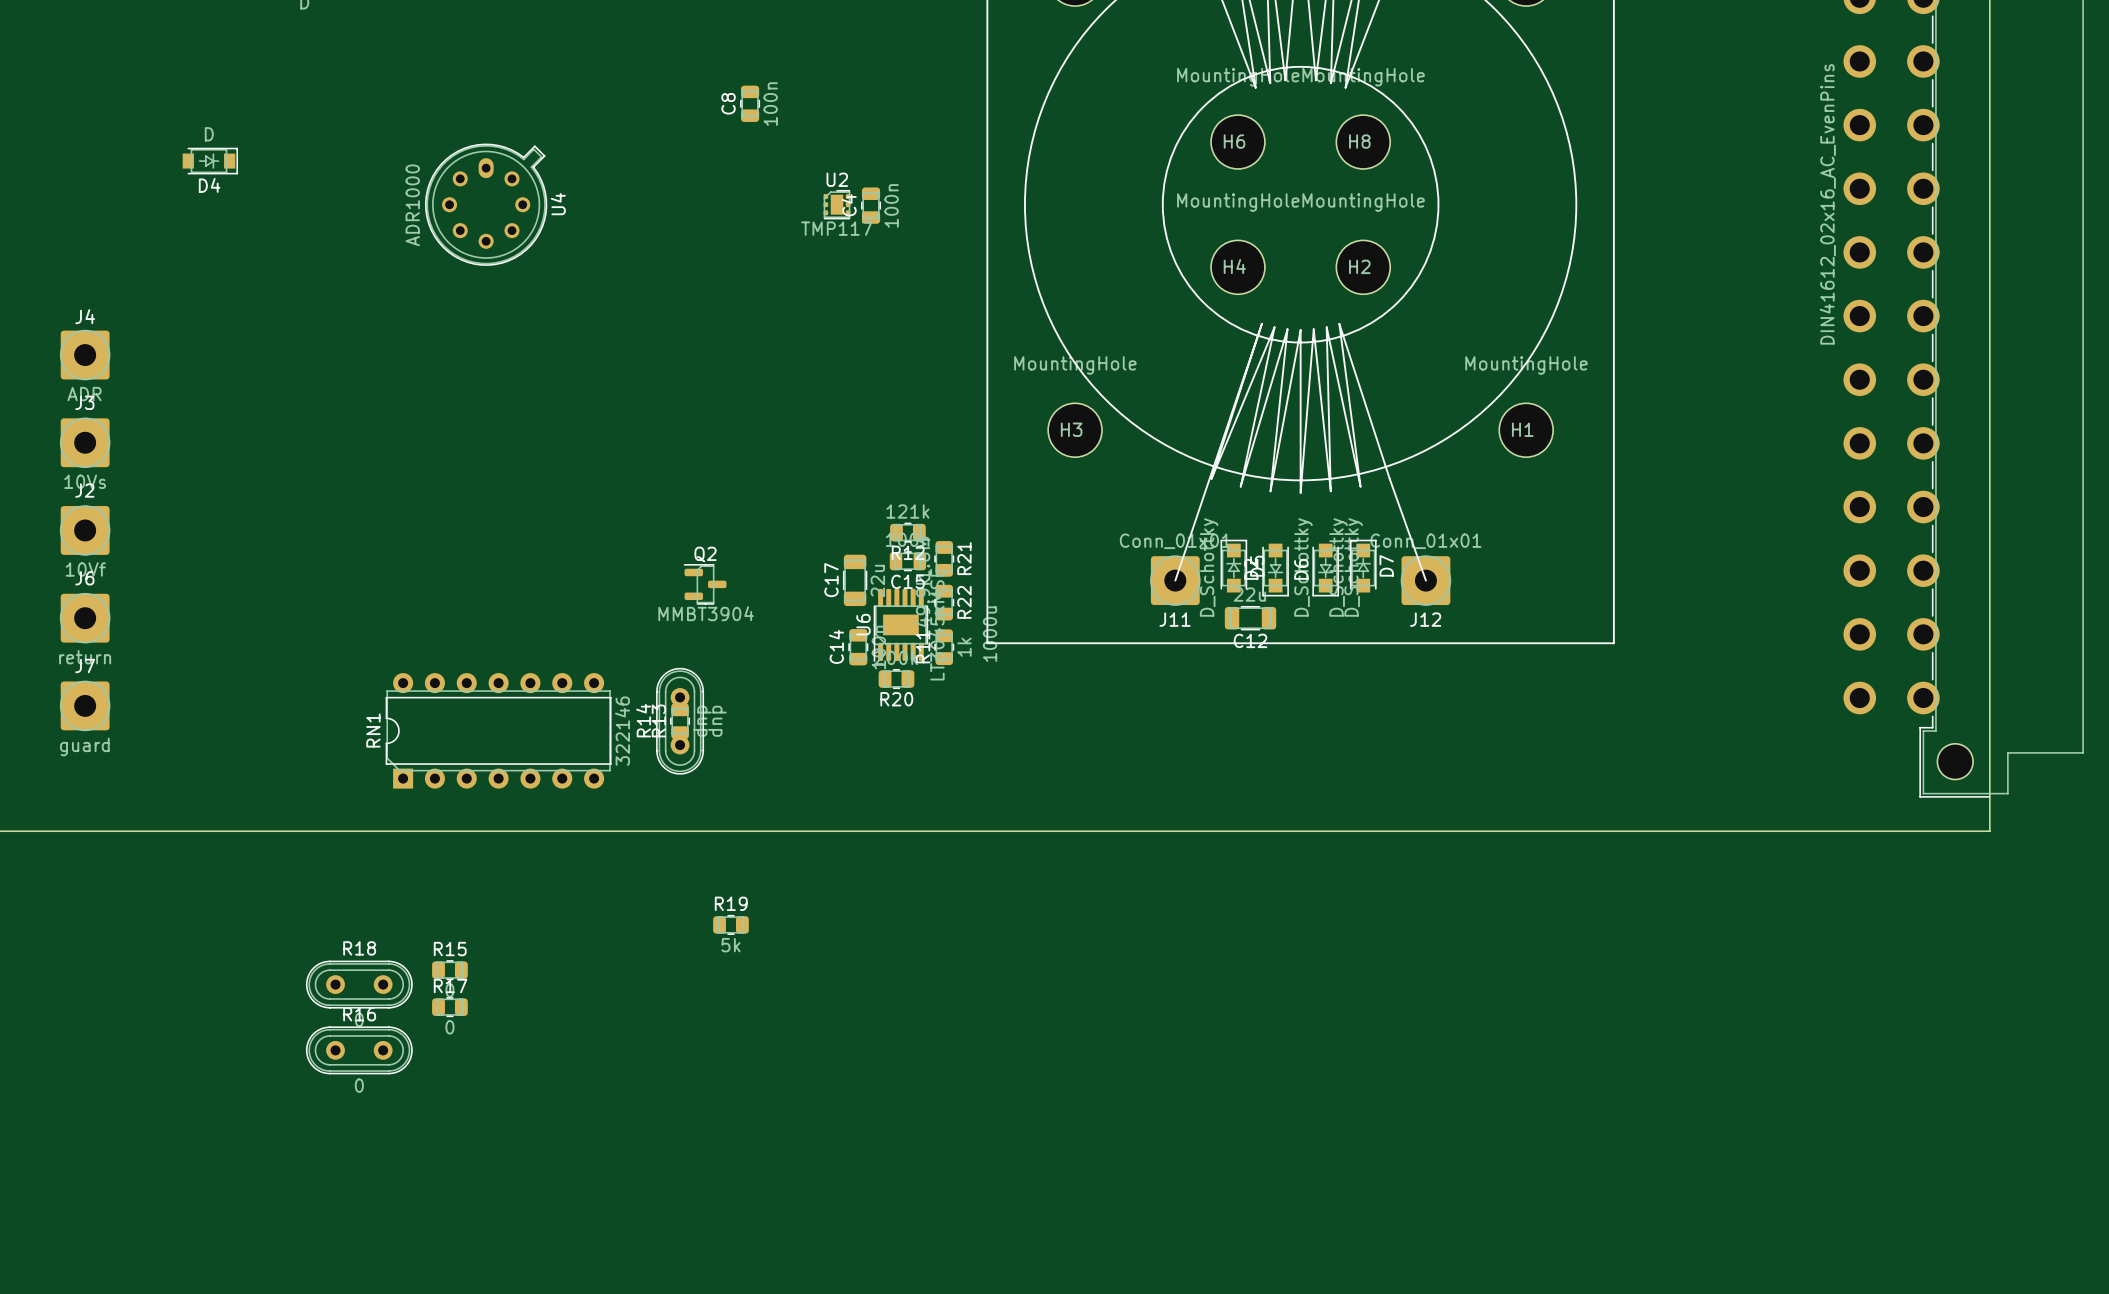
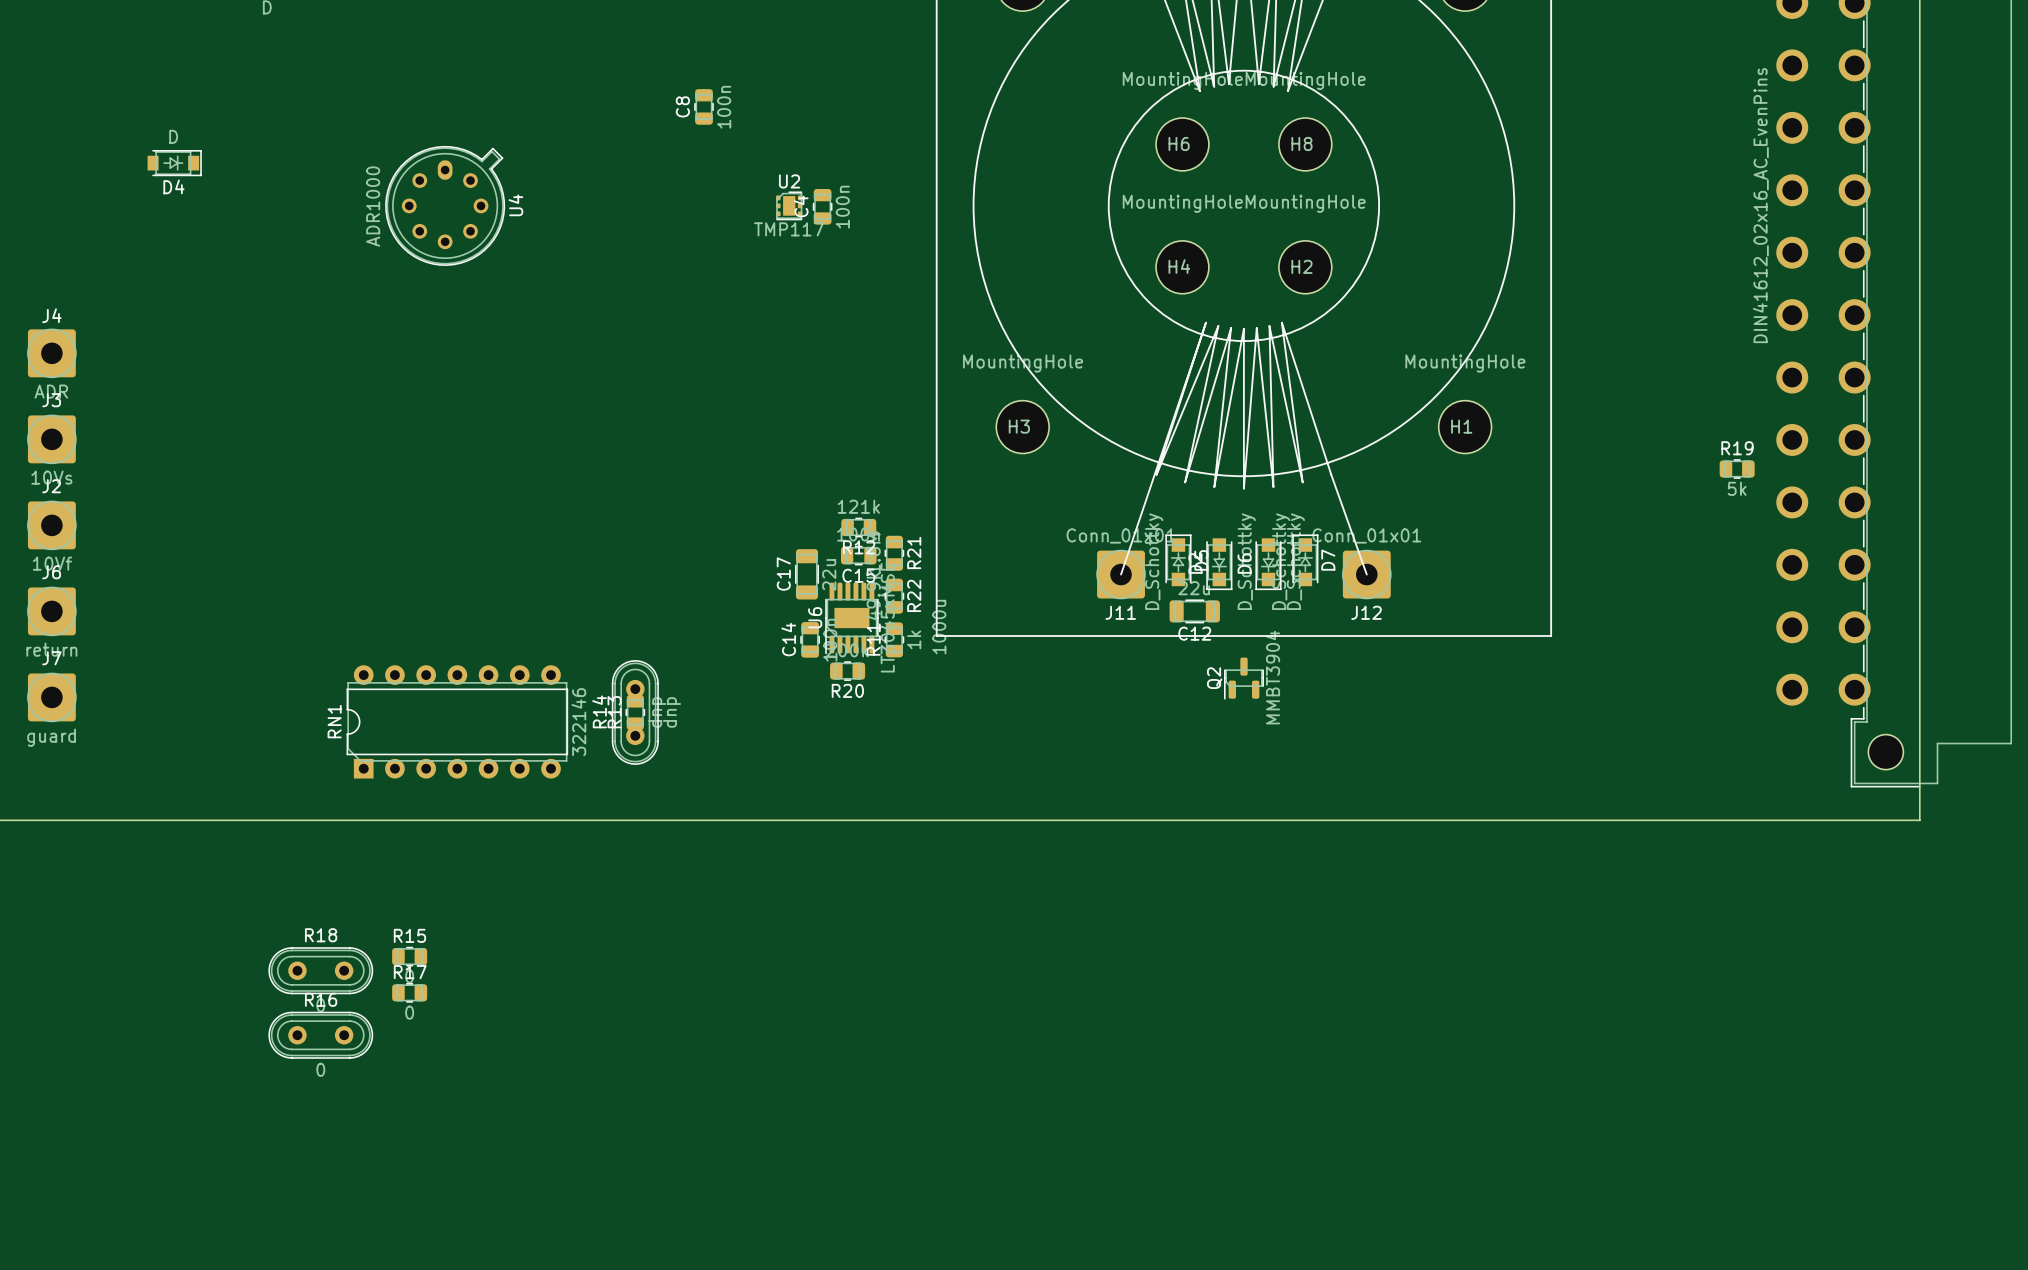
Q2 rotation: 0° (705, 584) -> 90° counterclockwise (1243, 678)
Q2 position: (705, 584) -> (1243, 678)
R19 position: (730, 924) -> (1737, 469)

